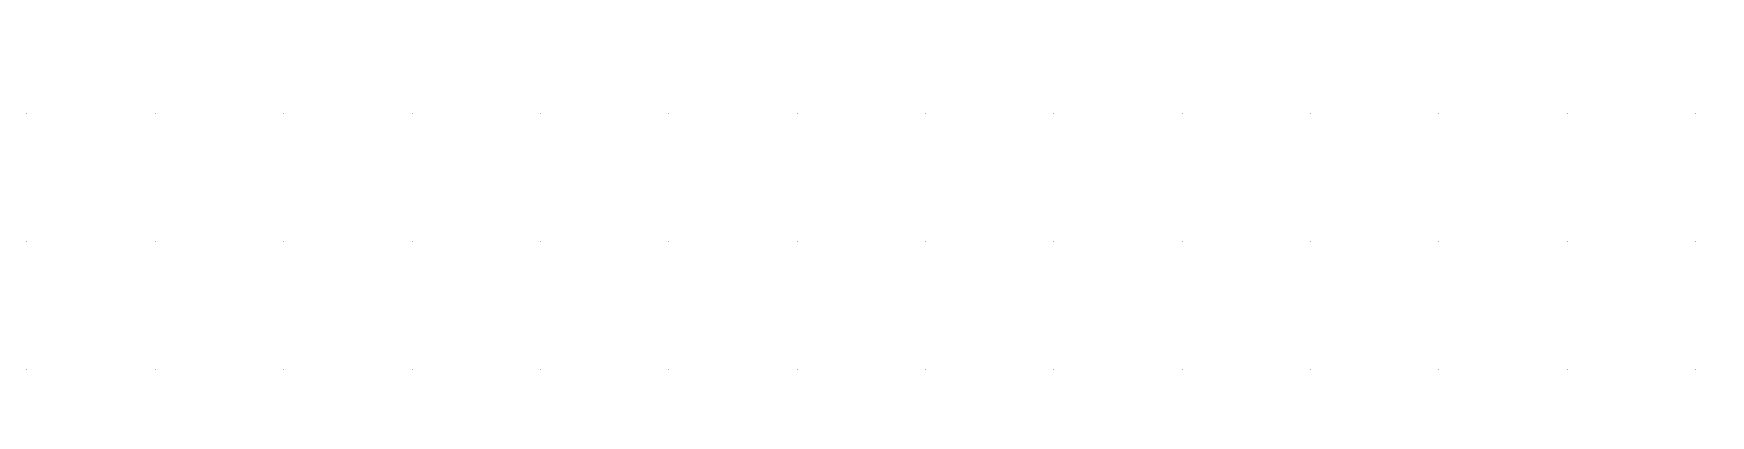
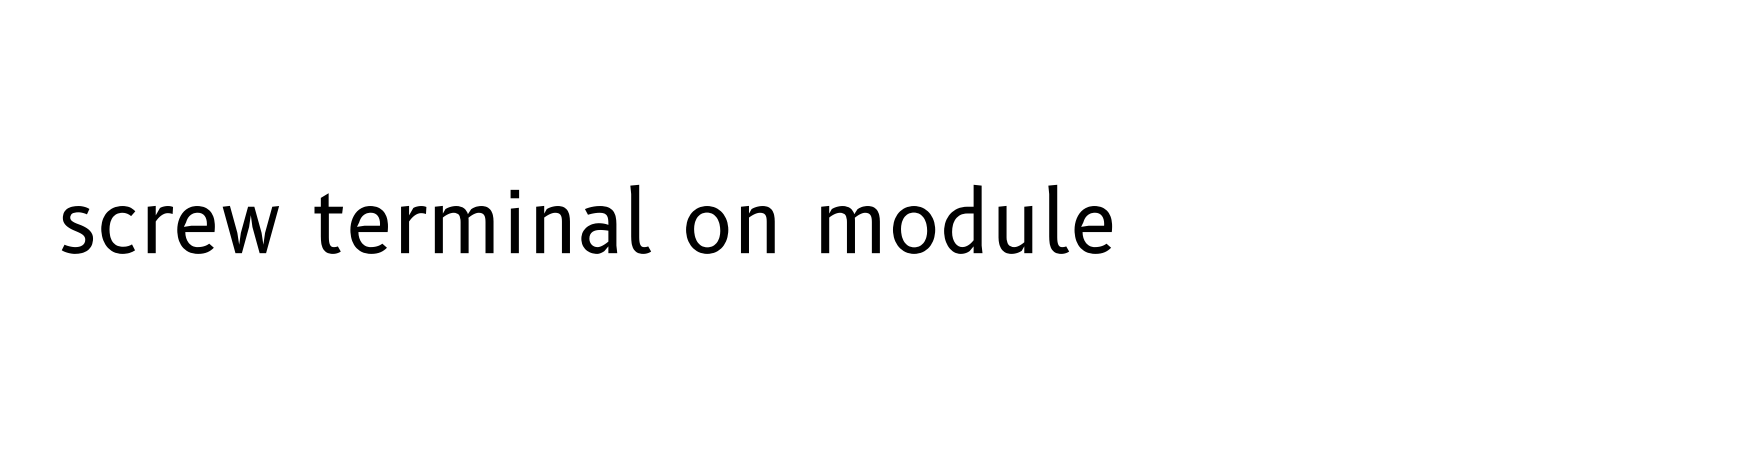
text: none -> screw terminal on module (586, 219)

